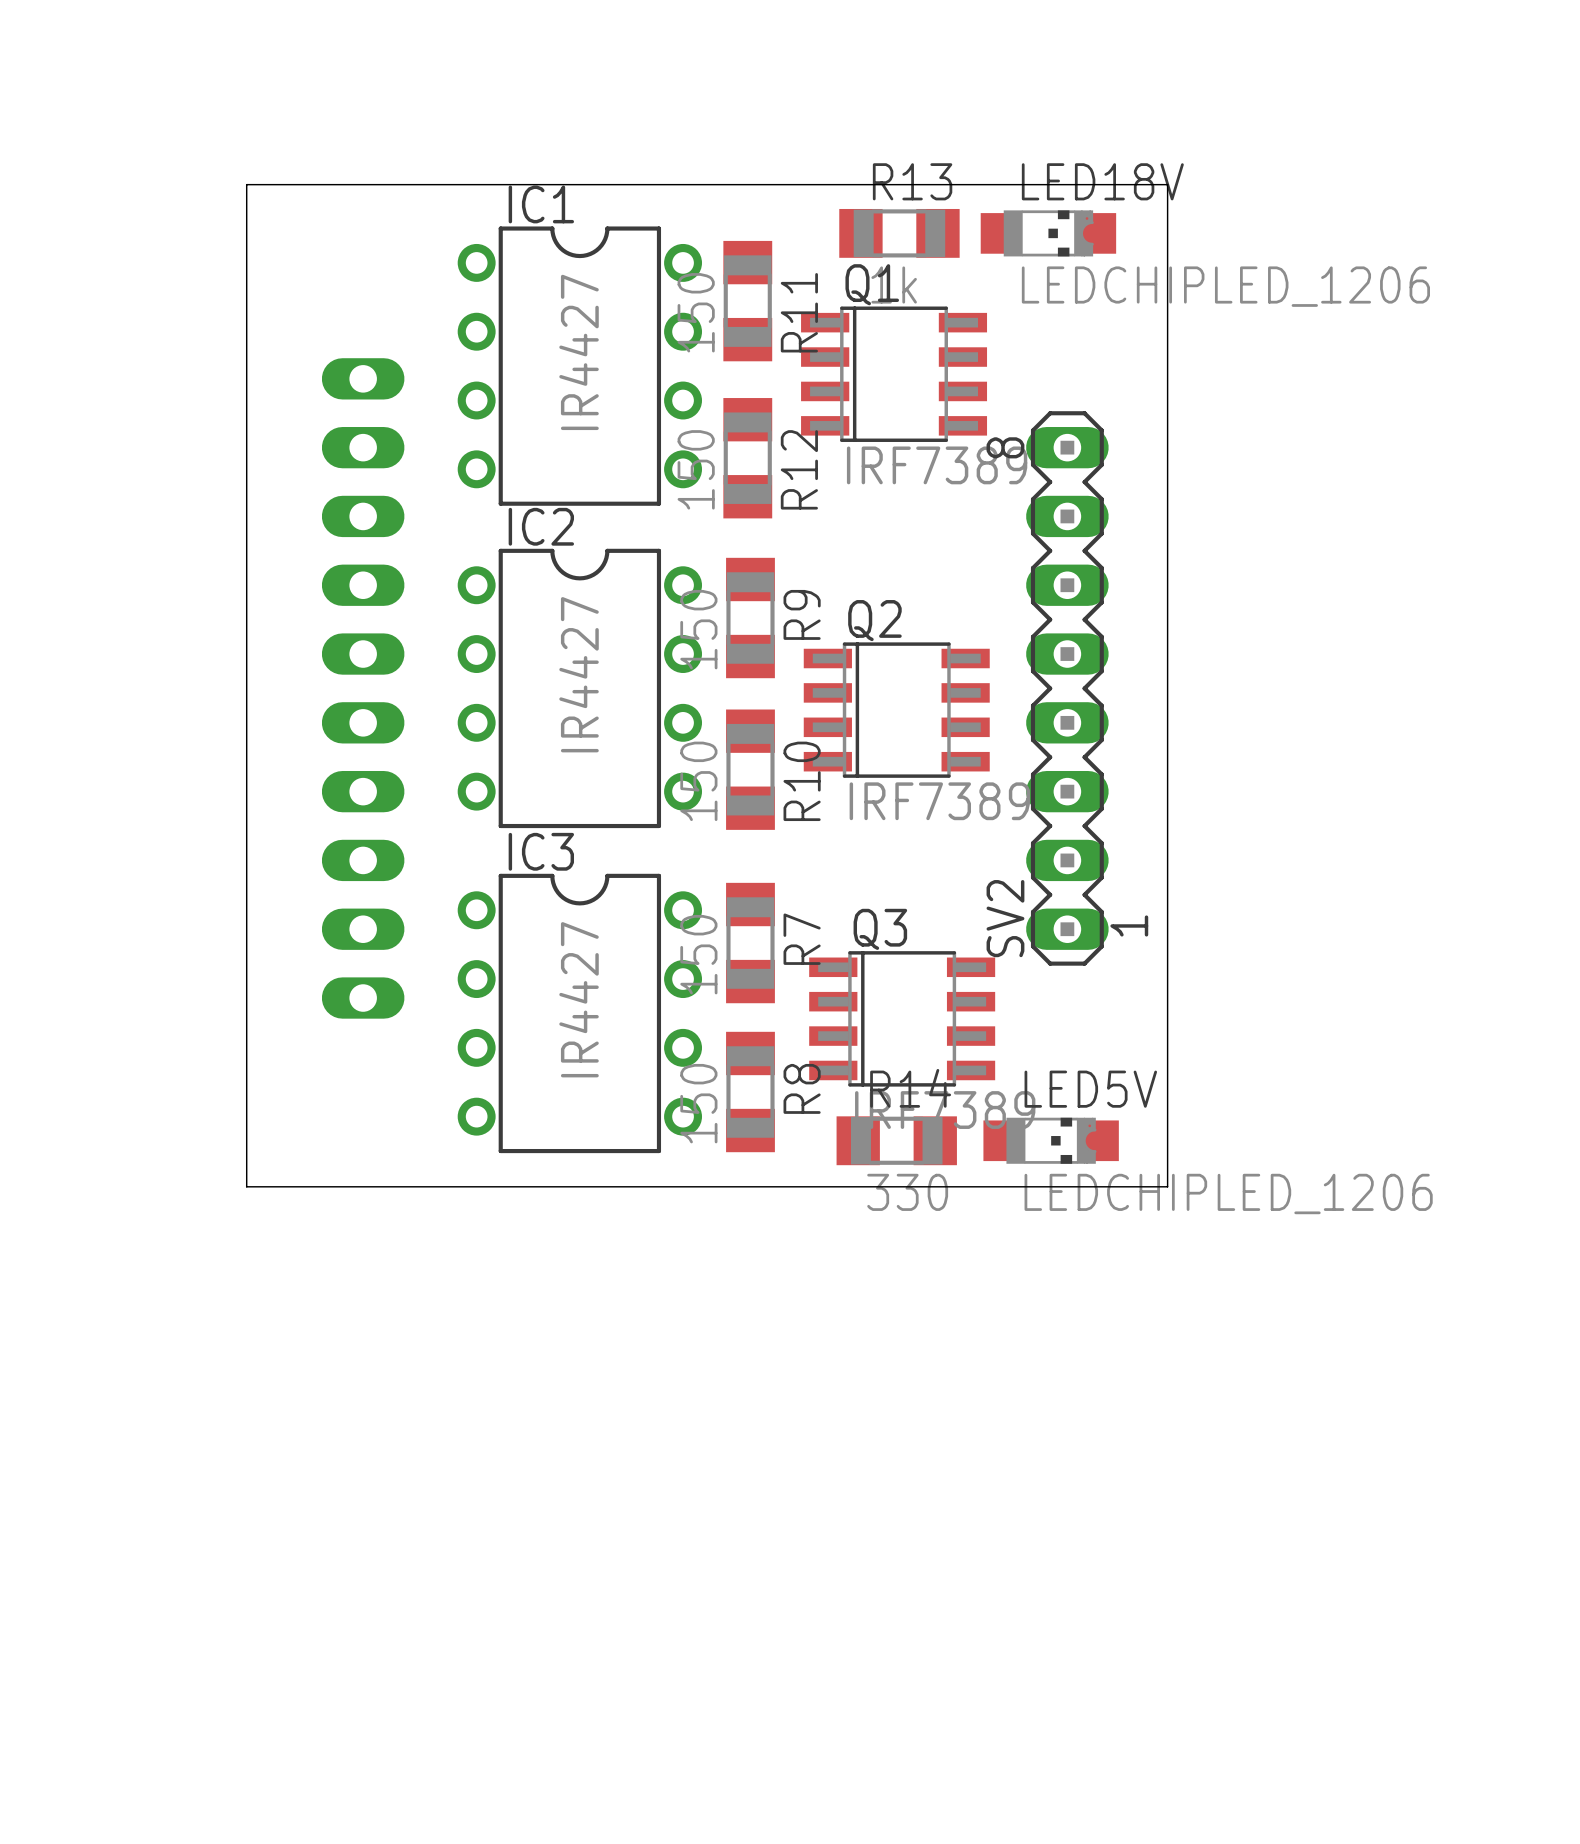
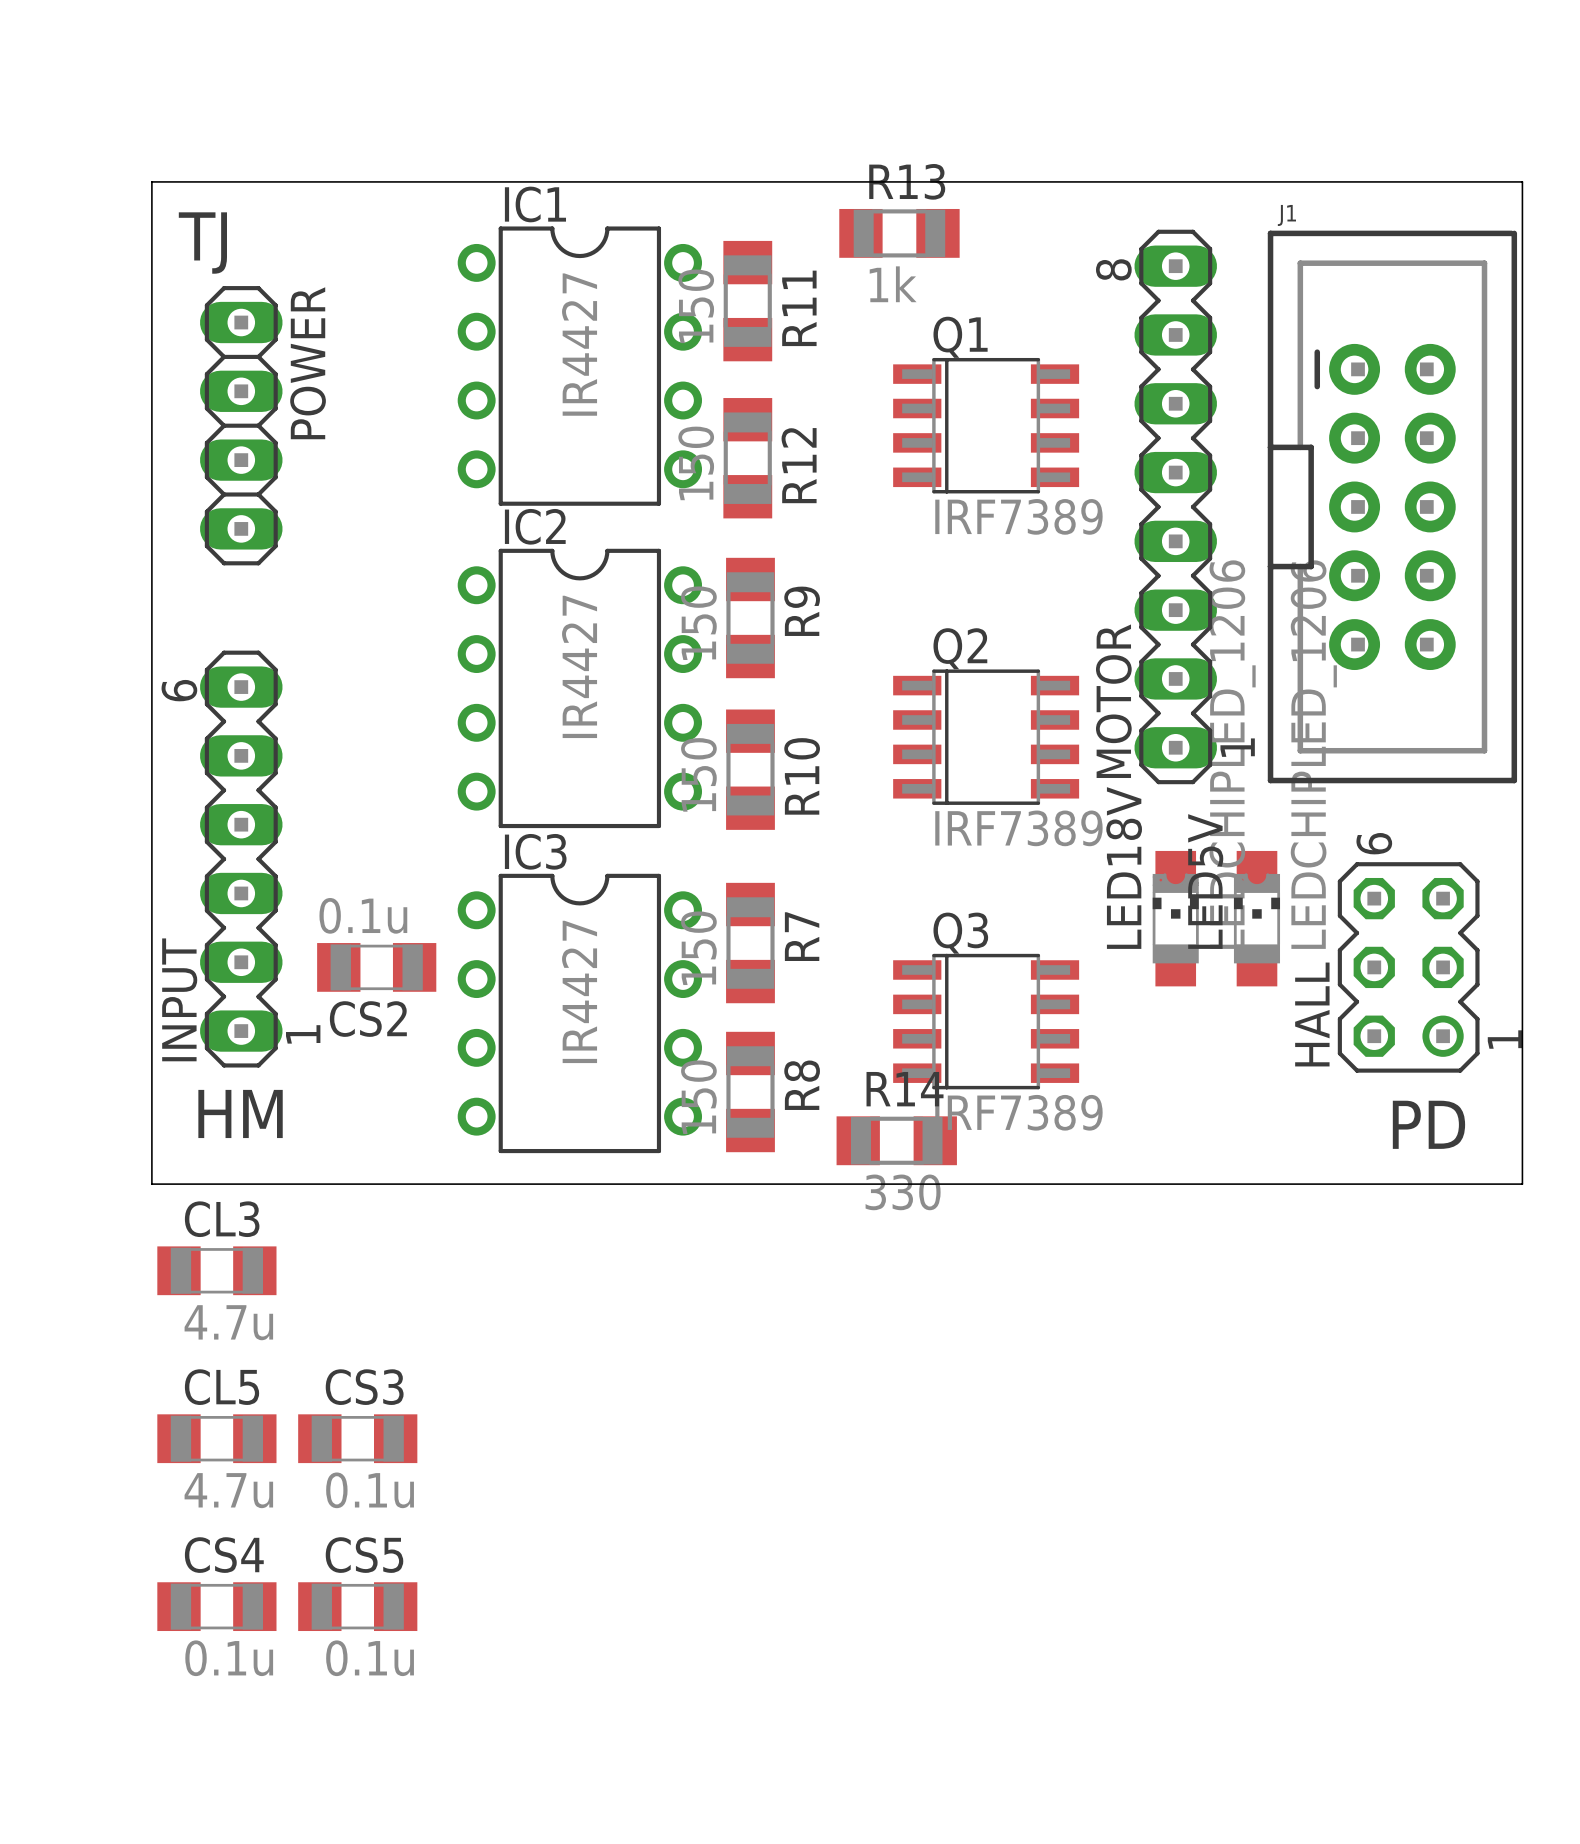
board edge: (246, 184) (1167, 184) (1167, 1186) (246, 1186) (246, 184) -> (151, 181) (151, 1184) (1522, 1184) (1522, 181) (151, 181)
LED18V rotation: 0° (1048, 233) -> 90° counterclockwise (1175, 918)
LED18V position: (1048, 233) -> (1175, 918)
text: none -> TJ (202, 243)
Q1 position: (894, 374) -> (986, 425)
POWER: none -> (241, 425)
MOTOR: none -> (1175, 506)
J1: none -> (1392, 506)
part: (363, 688) -> none
SV2: (1067, 688) -> none
Q2 position: (896, 710) -> (986, 737)
INPUT: none -> (241, 859)
CS2: none -> 0.1u (376, 967)
HALL: none -> (1408, 967)
Q3 position: (902, 1018) -> (986, 1021)
text: none -> HM (240, 1113)
text: none -> PD (1428, 1124)
LED5V rotation: 0° (1051, 1140) -> 90° counterclockwise (1256, 918)
LED5V position: (1051, 1140) -> (1256, 918)
CL3: none -> 4.7u (216, 1270)
CL5: none -> 4.7u (216, 1438)
CS3: none -> 0.1u (357, 1438)
CS4: none -> 0.1u (216, 1606)
CS5: none -> 0.1u (357, 1606)

